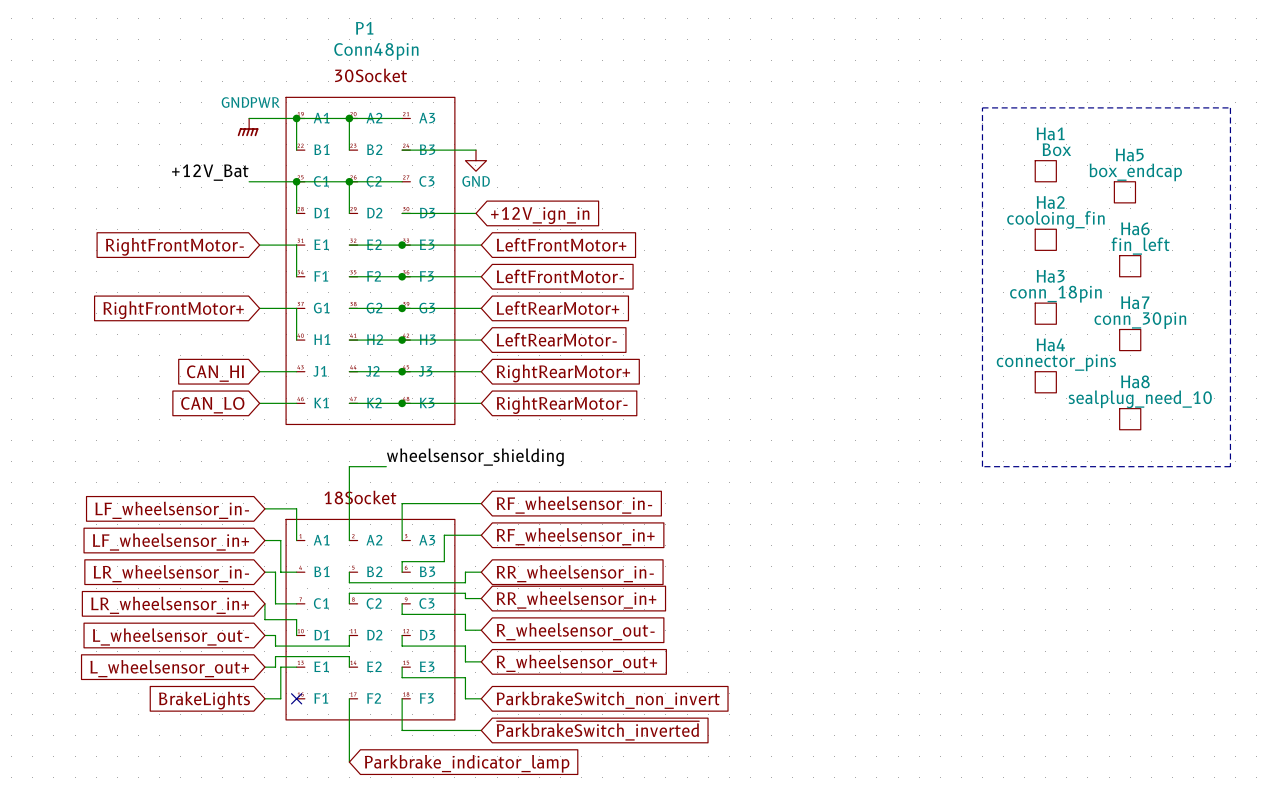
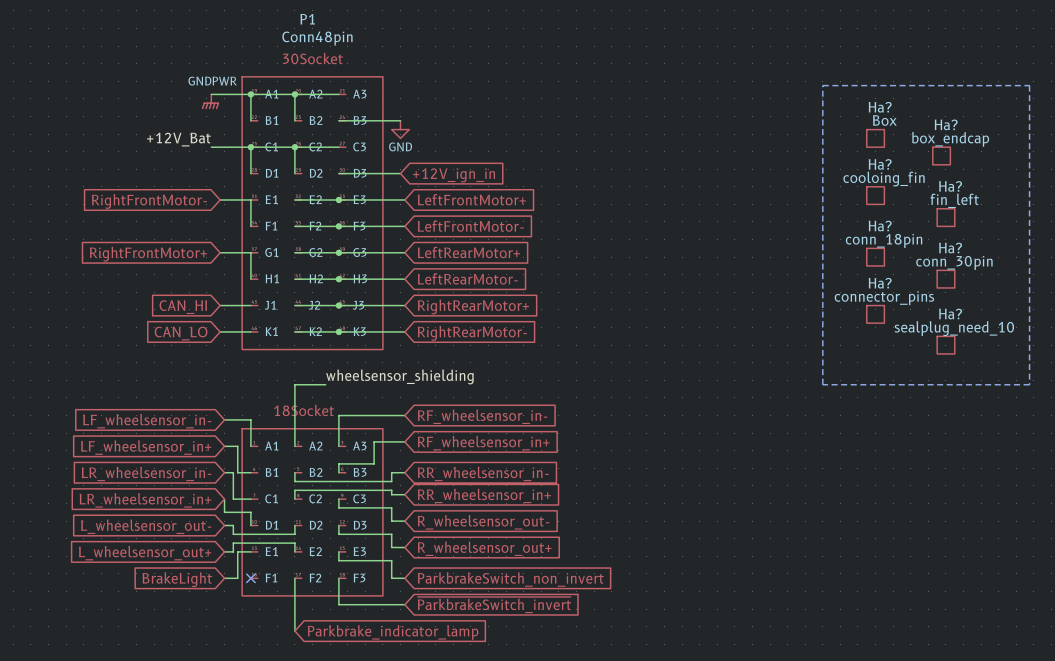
Ha1 name: Ha1 (1050, 133) -> Ha? (880, 107)
Ha5 name: Ha5 (1129, 154) -> Ha? (946, 124)
Ha2 name: Ha2 (1050, 202) -> Ha? (880, 164)
Ha6 name: Ha6 (1135, 228) -> Ha? (950, 186)
Ha3 name: Ha3 (1050, 276) -> Ha? (880, 226)
Ha7 name: Ha7 (1135, 302) -> Ha? (950, 248)
Ha4 name: Ha4 (1050, 344) -> Ha? (880, 283)
Ha8 name: Ha8 (1135, 381) -> Ha? (950, 314)
global label: BrakeLights (204, 700) -> BrakeLight (177, 579)
global label: ~{ParkbrakeSwitch_inverted} (597, 730) -> ~{ParkbrakeSwitch_invert} (494, 605)

